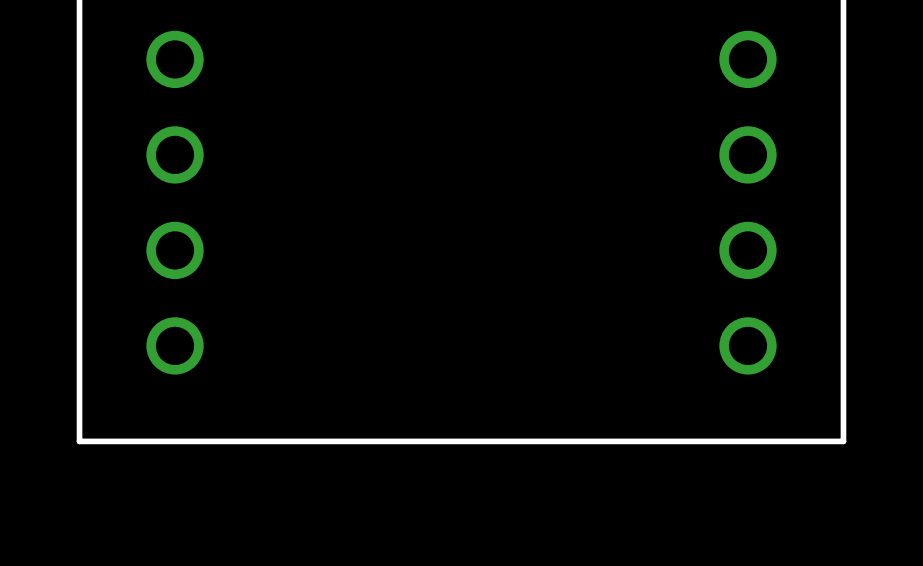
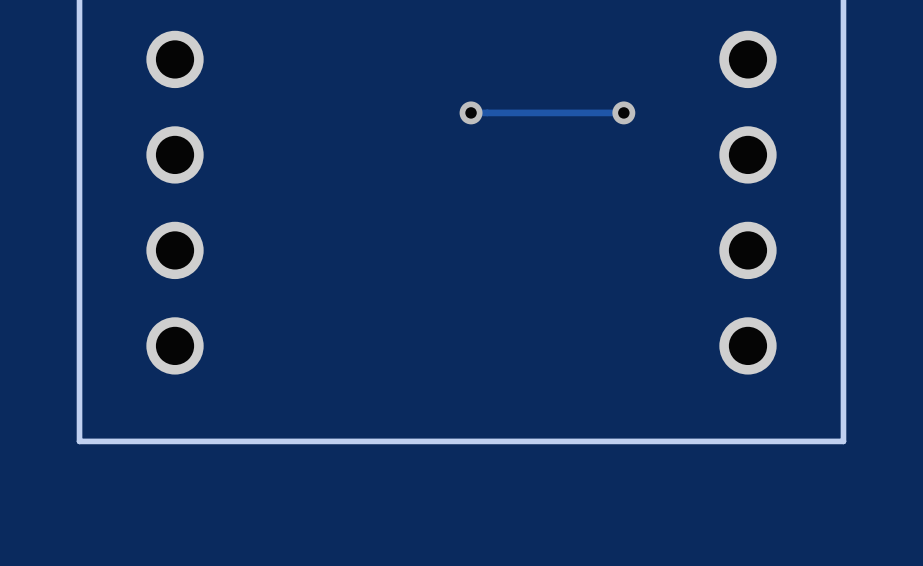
via: none -> (471, 112)
track: none -> (623, 112) (471, 112)
via: none -> (623, 112)

